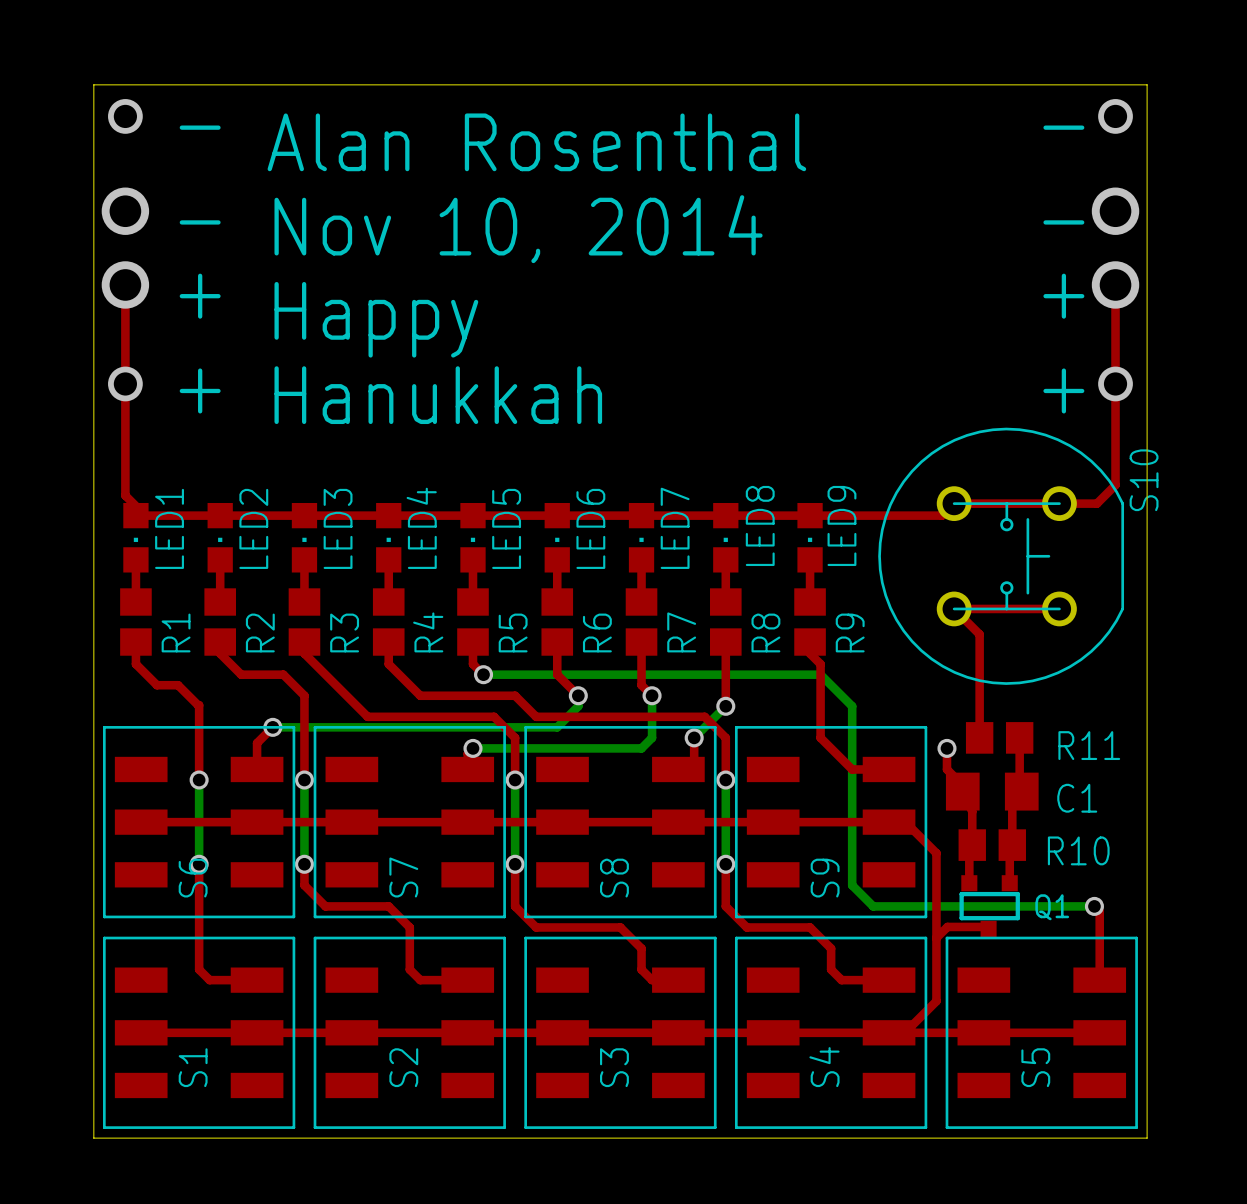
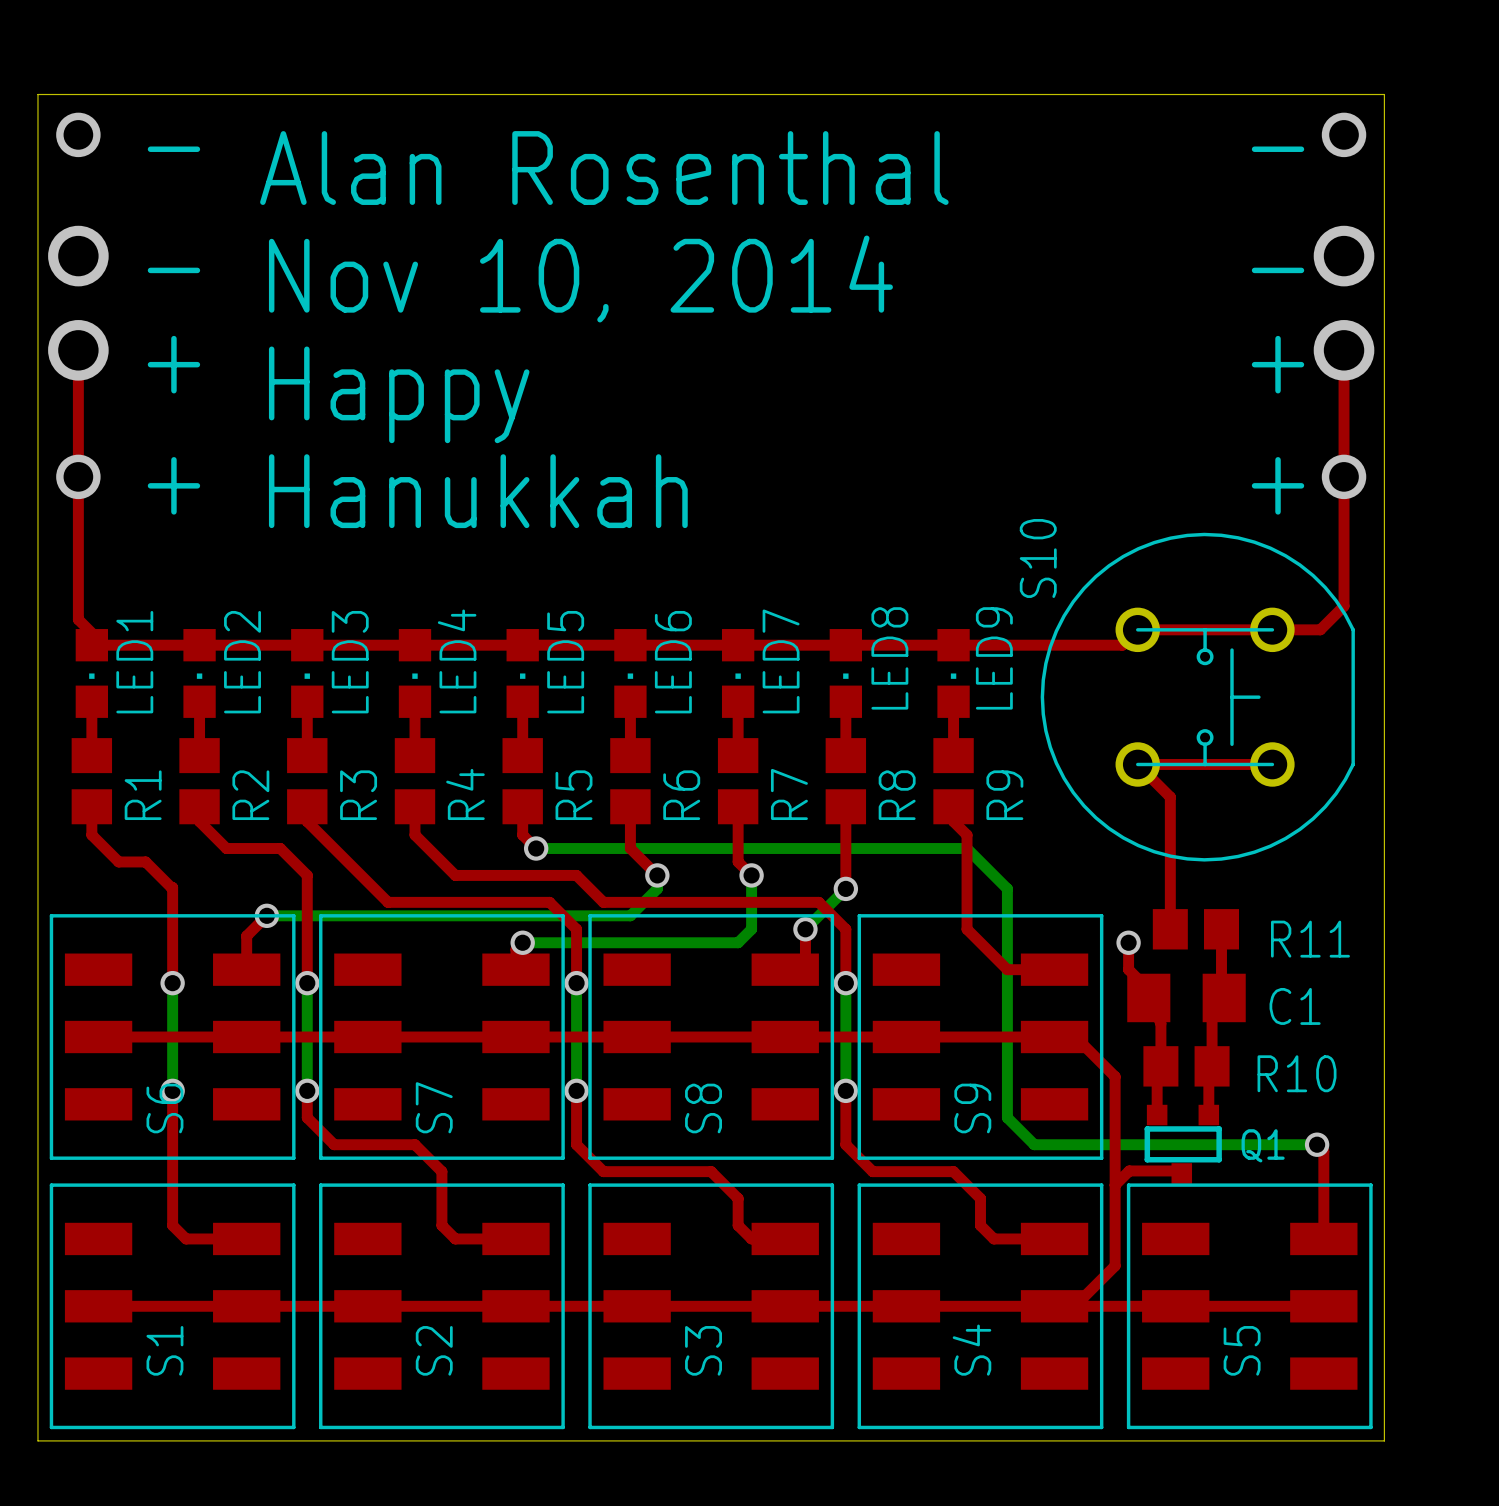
S10 name position: S10 (1144, 480) -> S10 (1038, 558)

